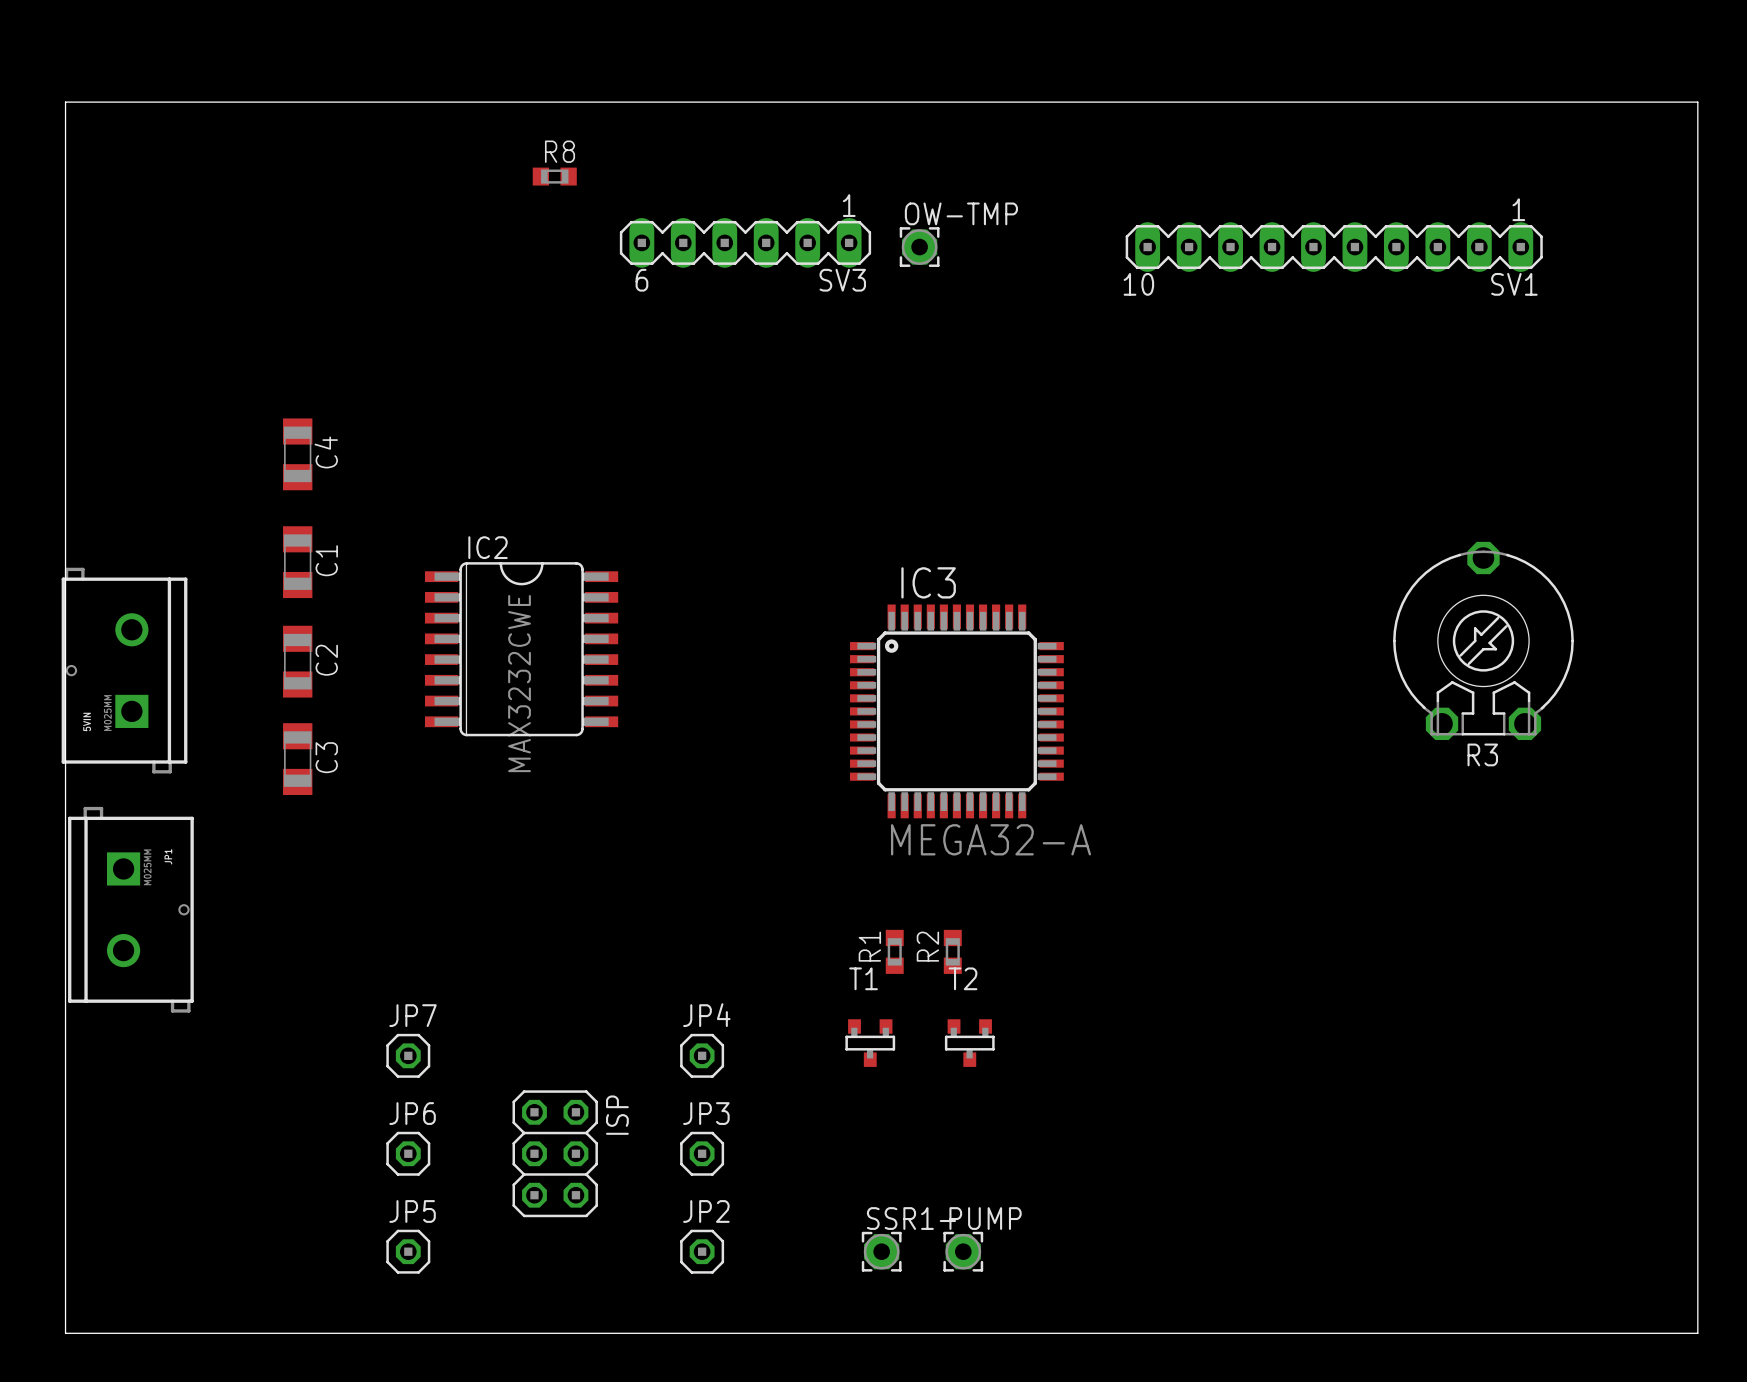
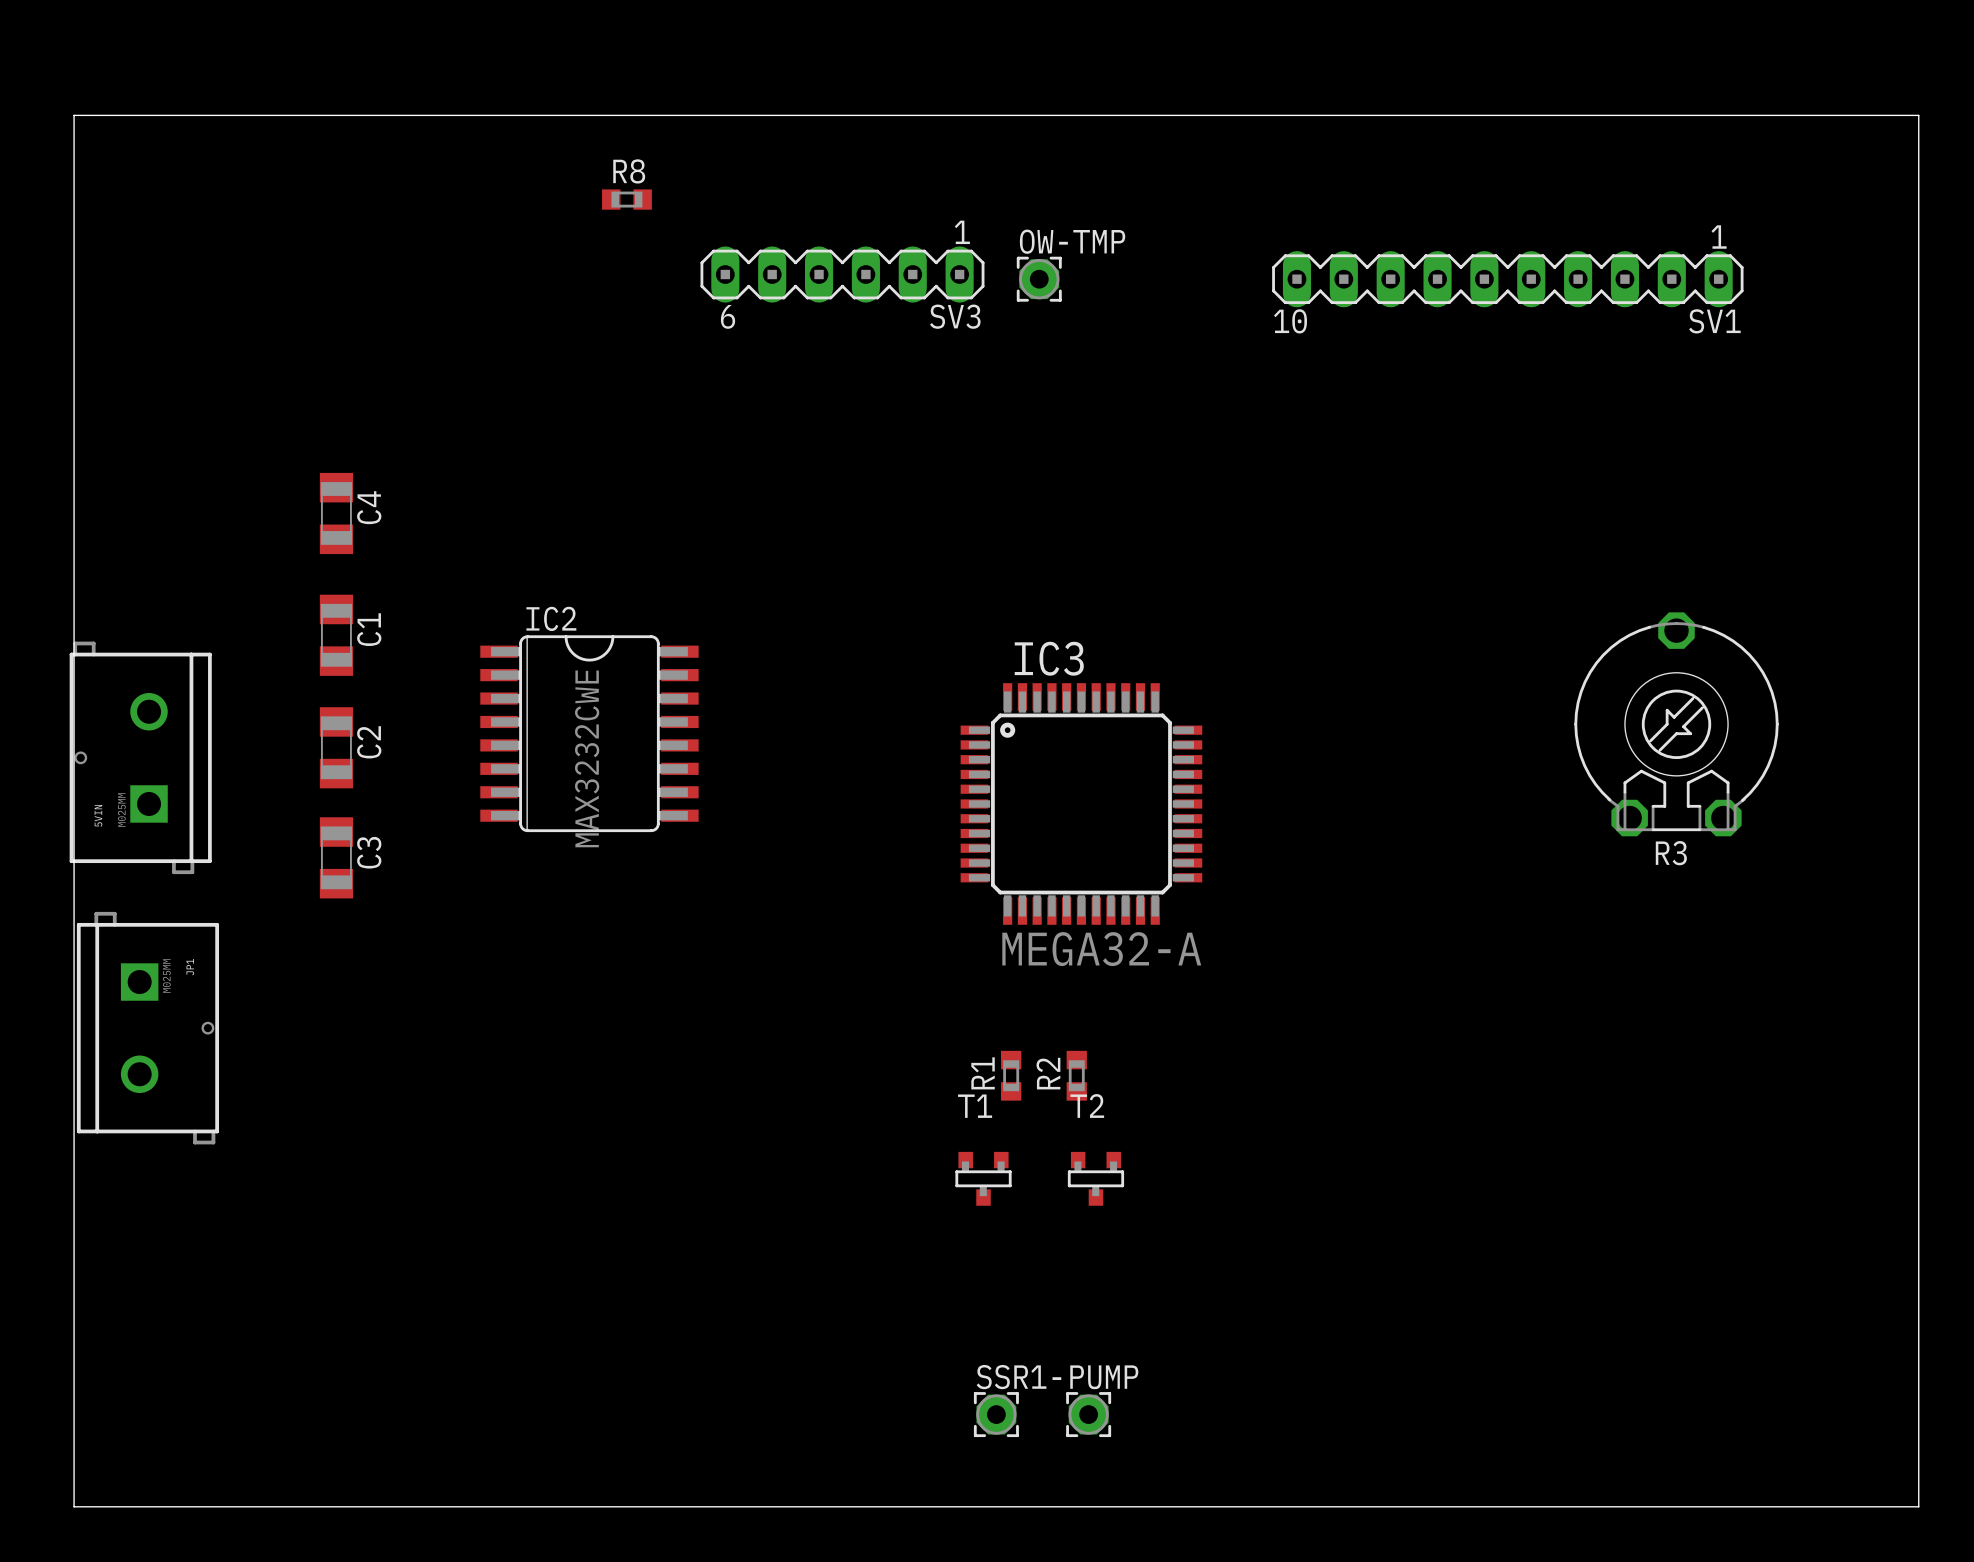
JP7: (408, 1055) -> none
JP4: (702, 1055) -> none
JP6: (408, 1153) -> none
ISP: (555, 1153) -> none
JP3: (702, 1153) -> none
JP5: (408, 1251) -> none
JP2: (702, 1251) -> none

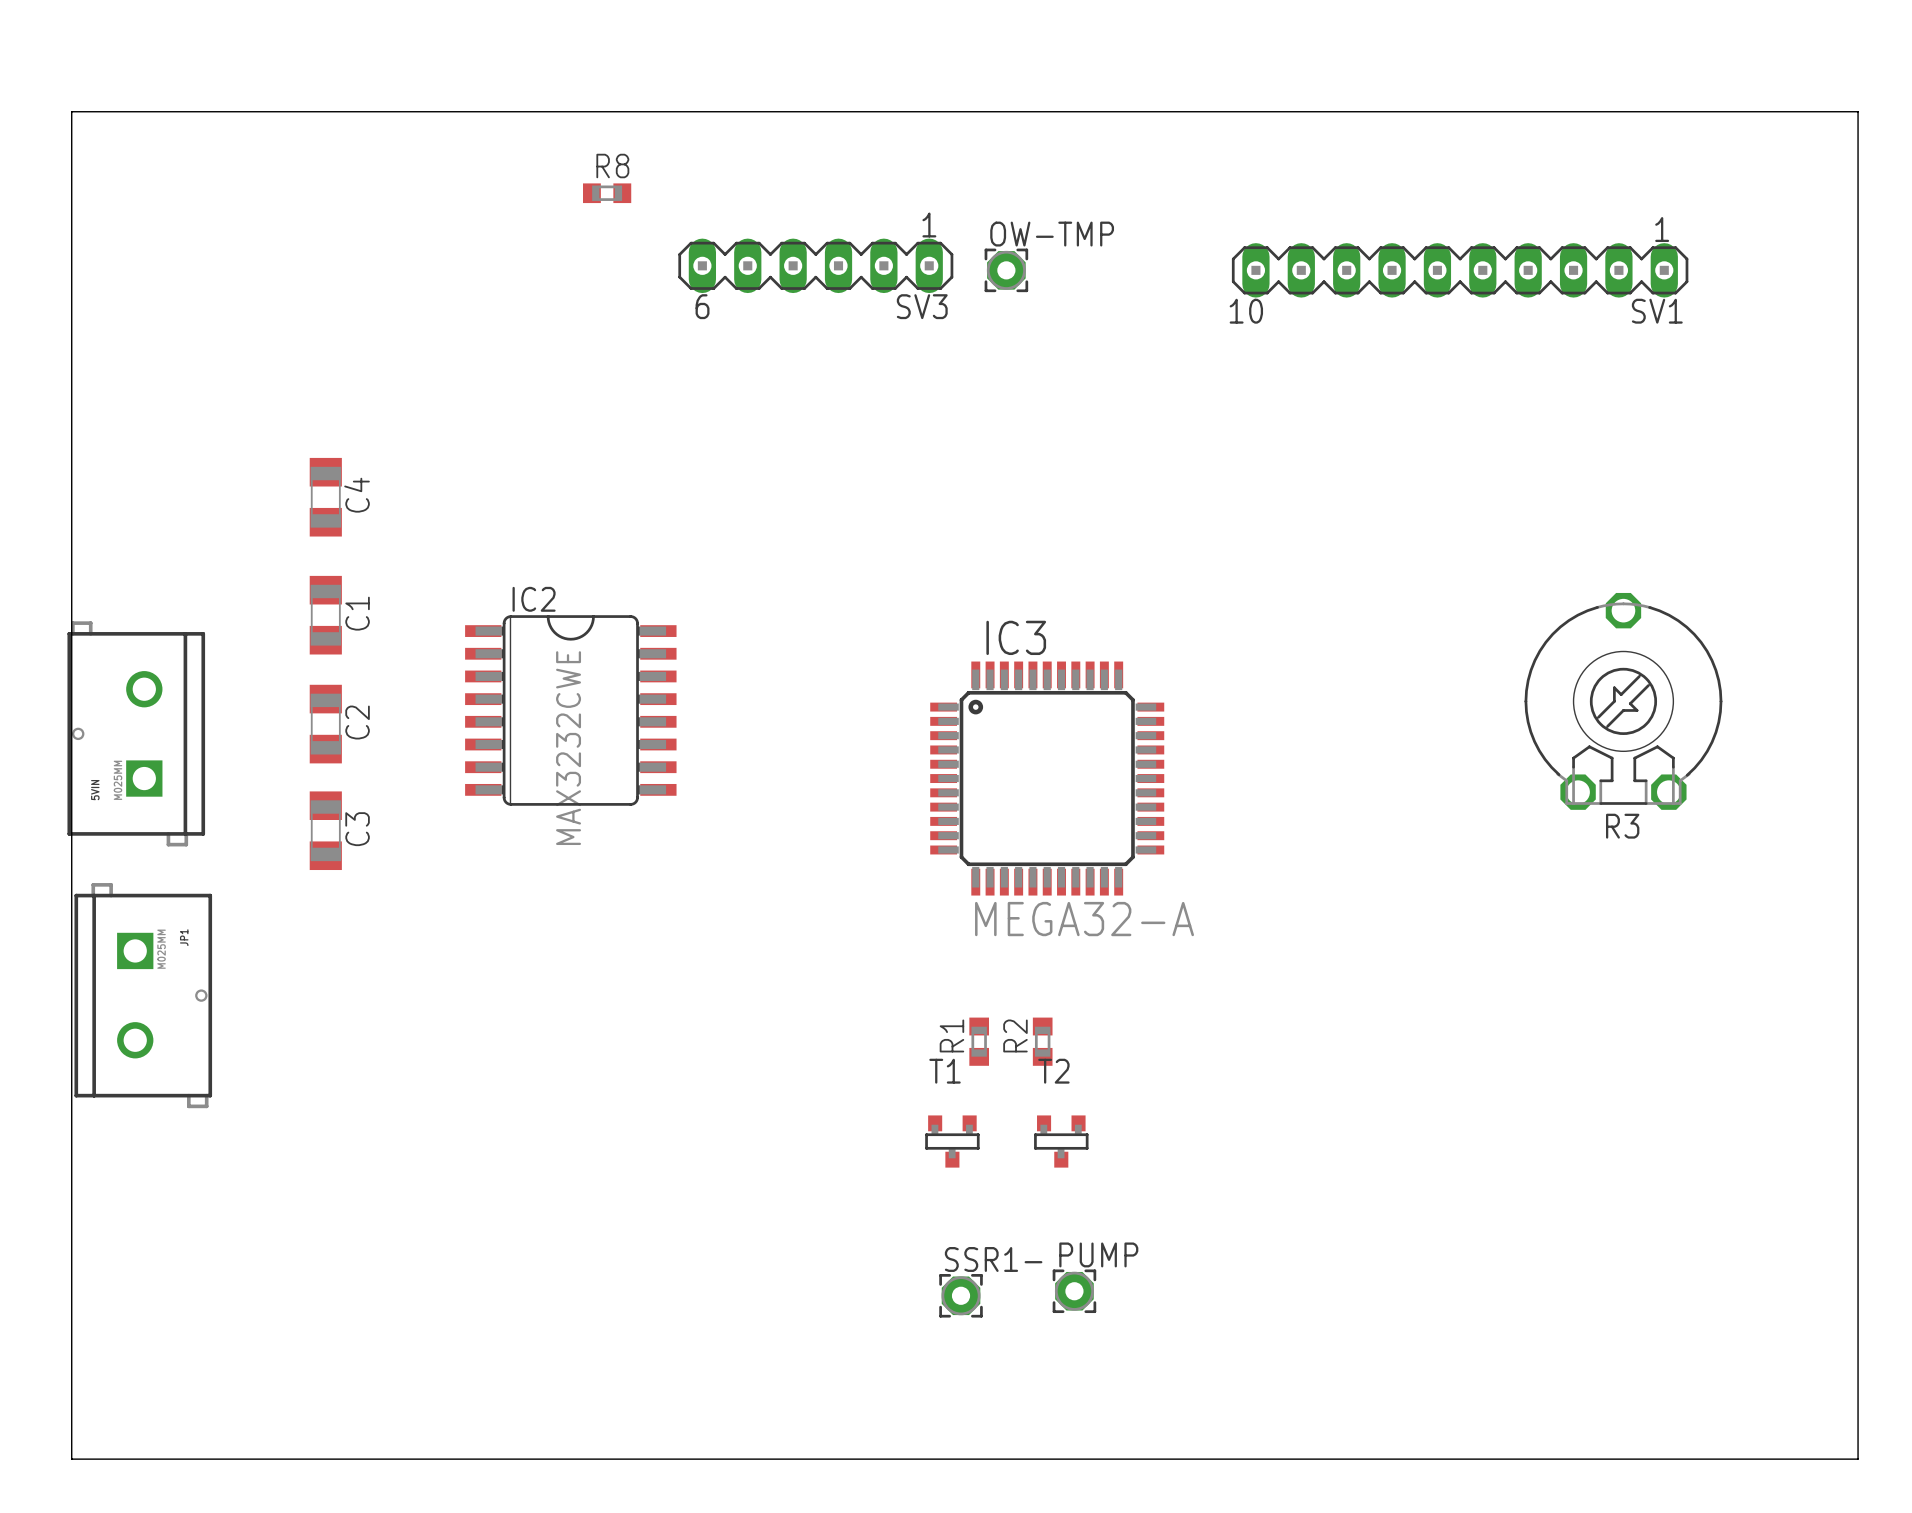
SSR1- position: (996, 1414) -> (961, 1295)
PUMP position: (1088, 1414) -> (1074, 1291)

